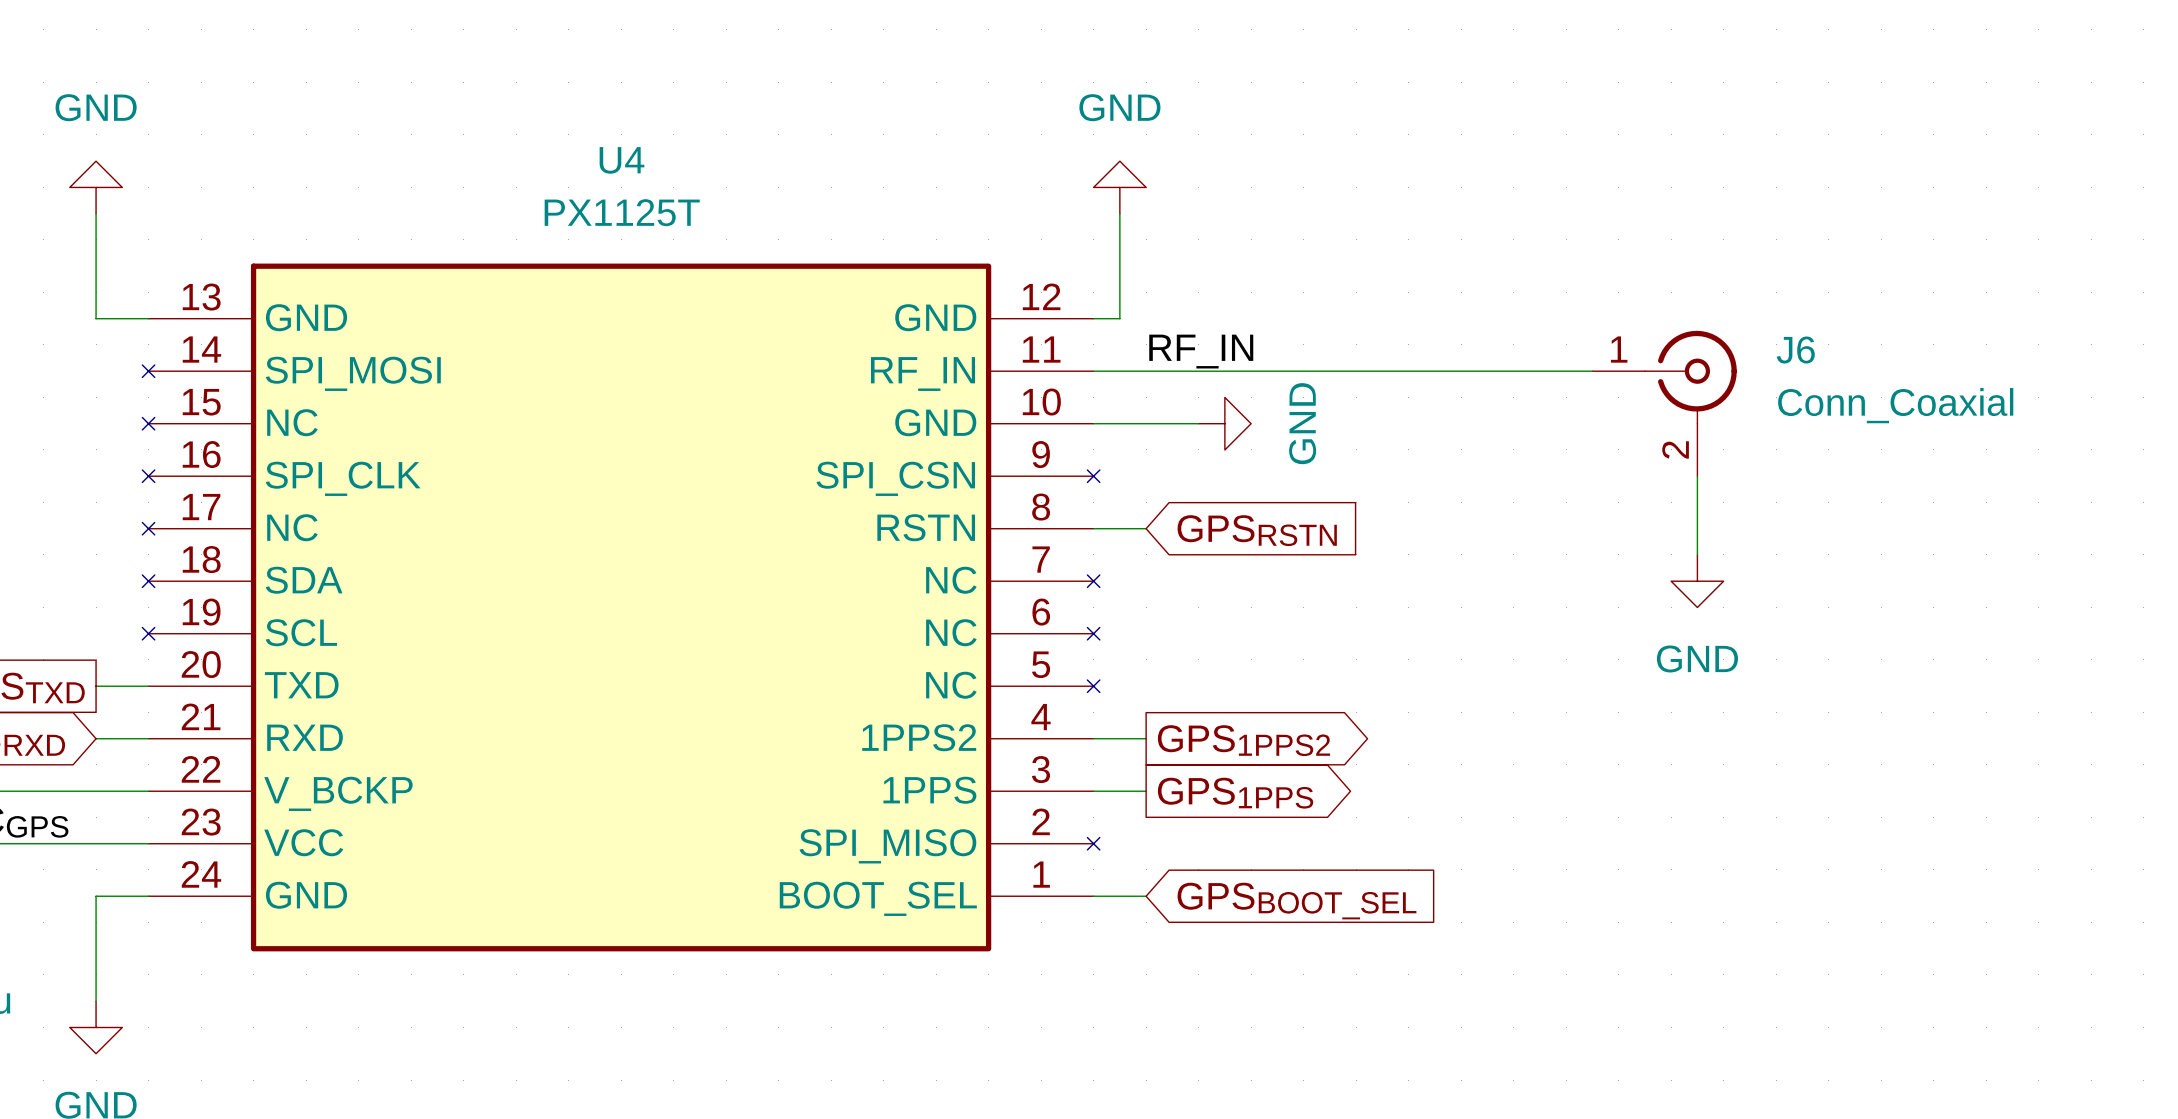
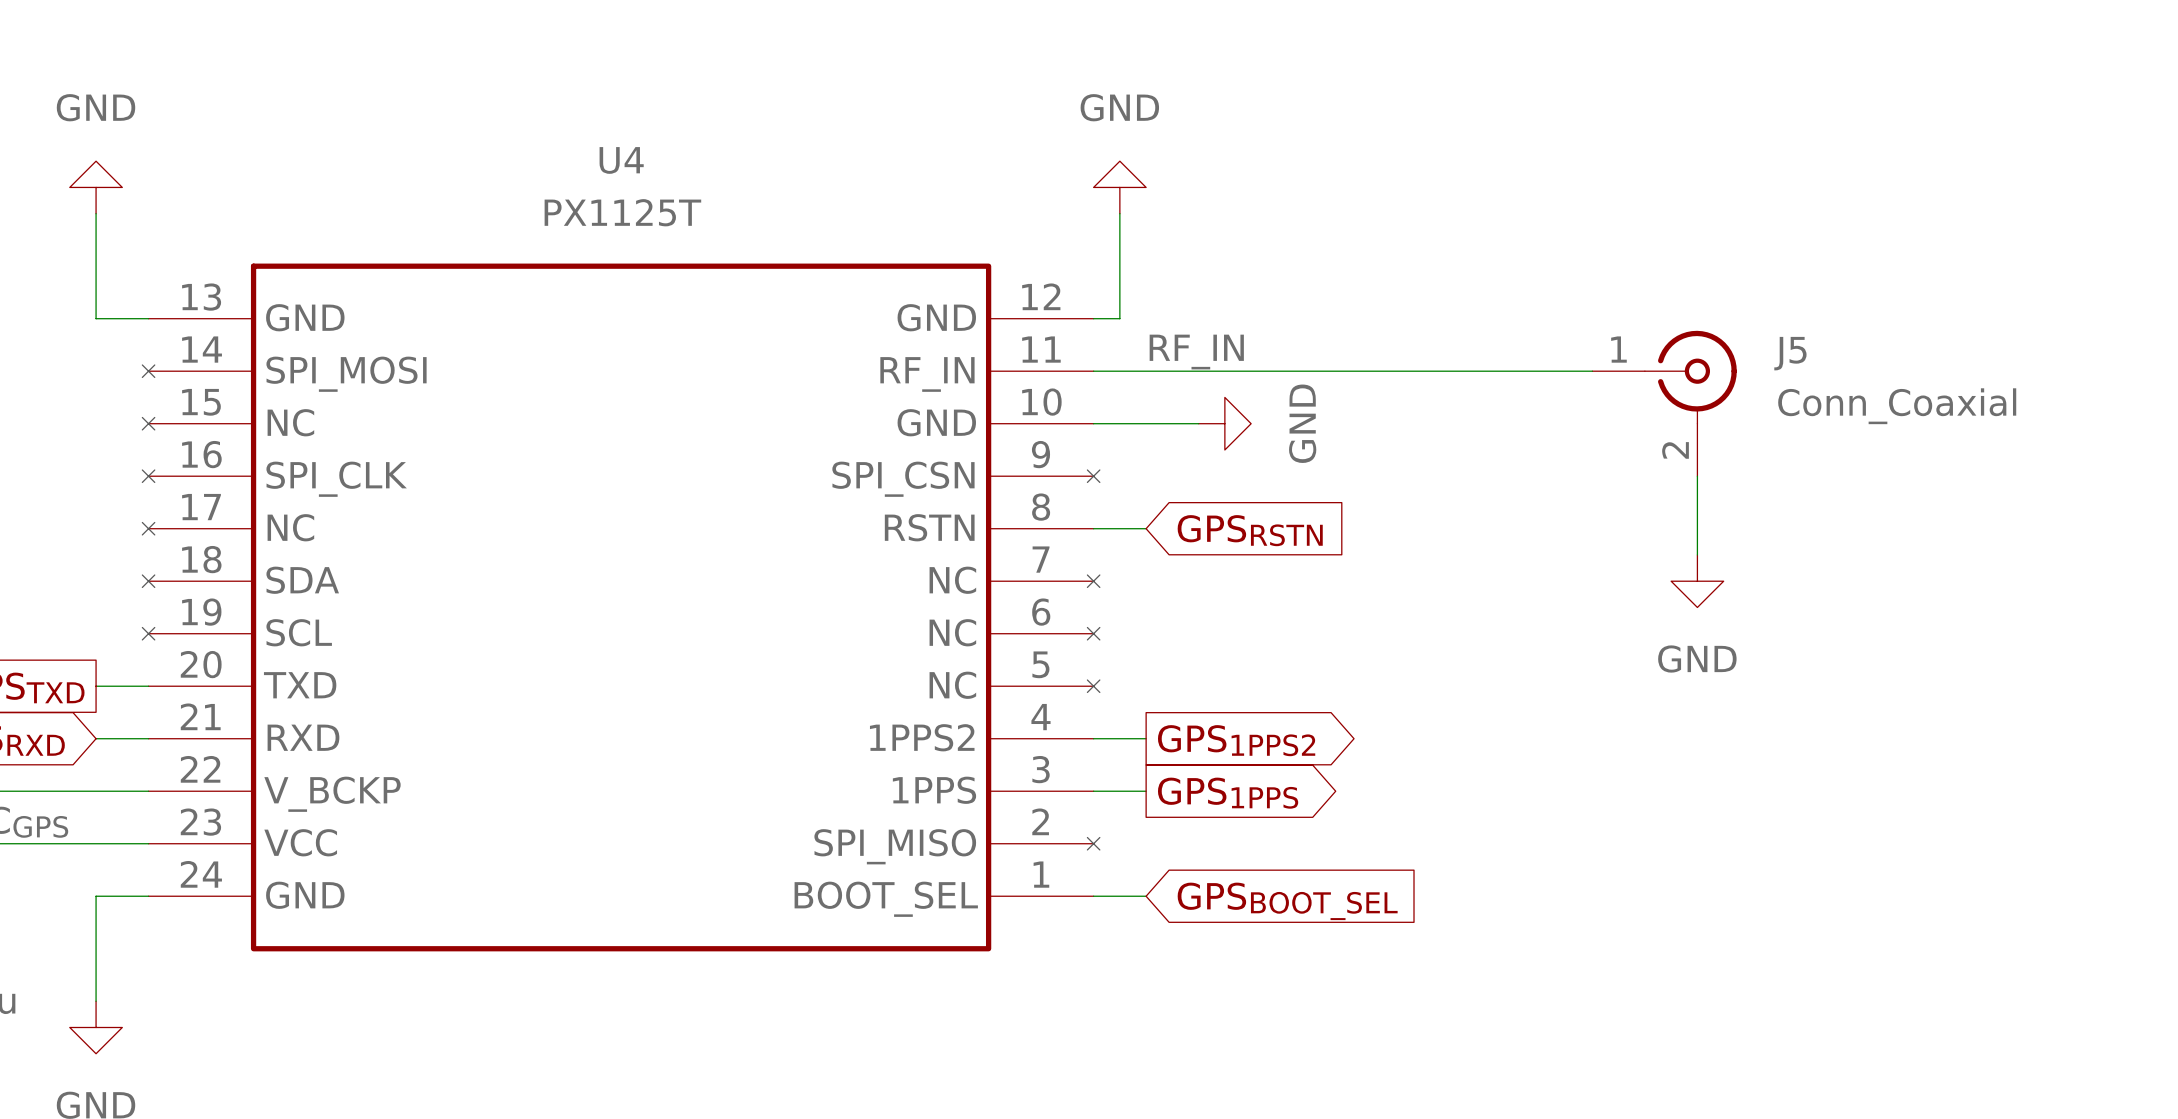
J6 name: J6 (1795, 350) -> J5 (1790, 353)

